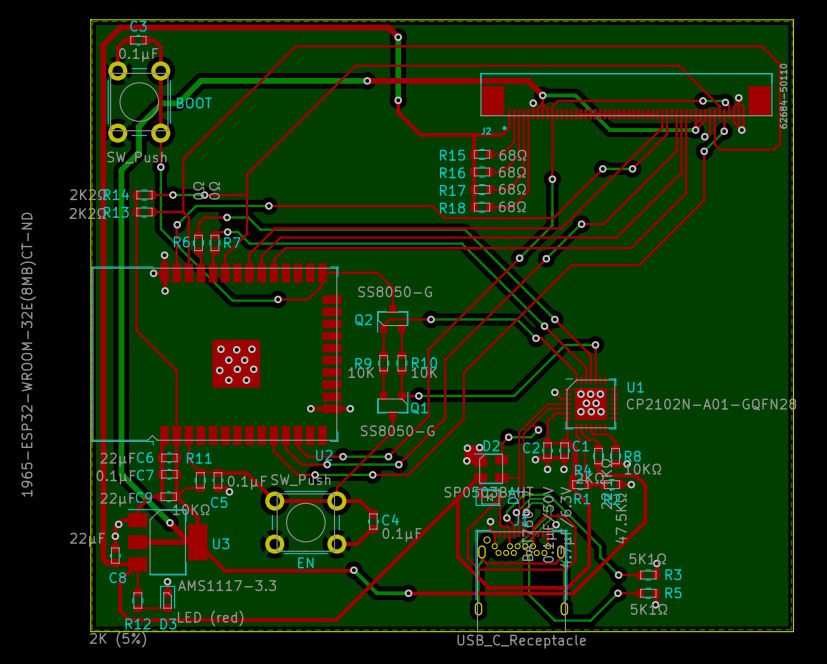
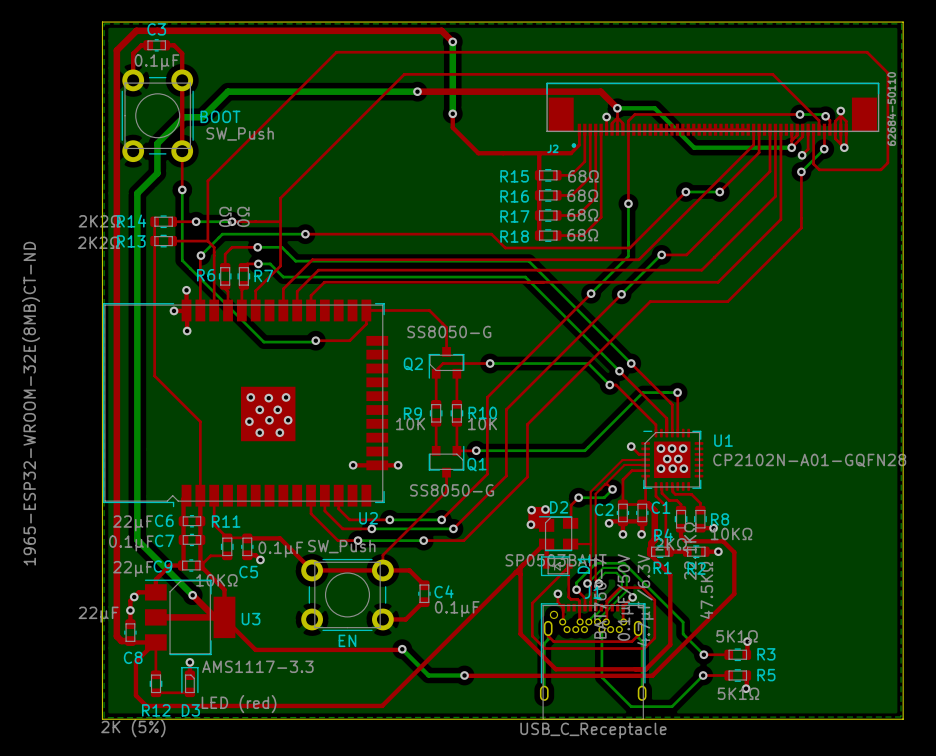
BOOT value position: SW_Push (136, 157) -> SW_Push (240, 133)

